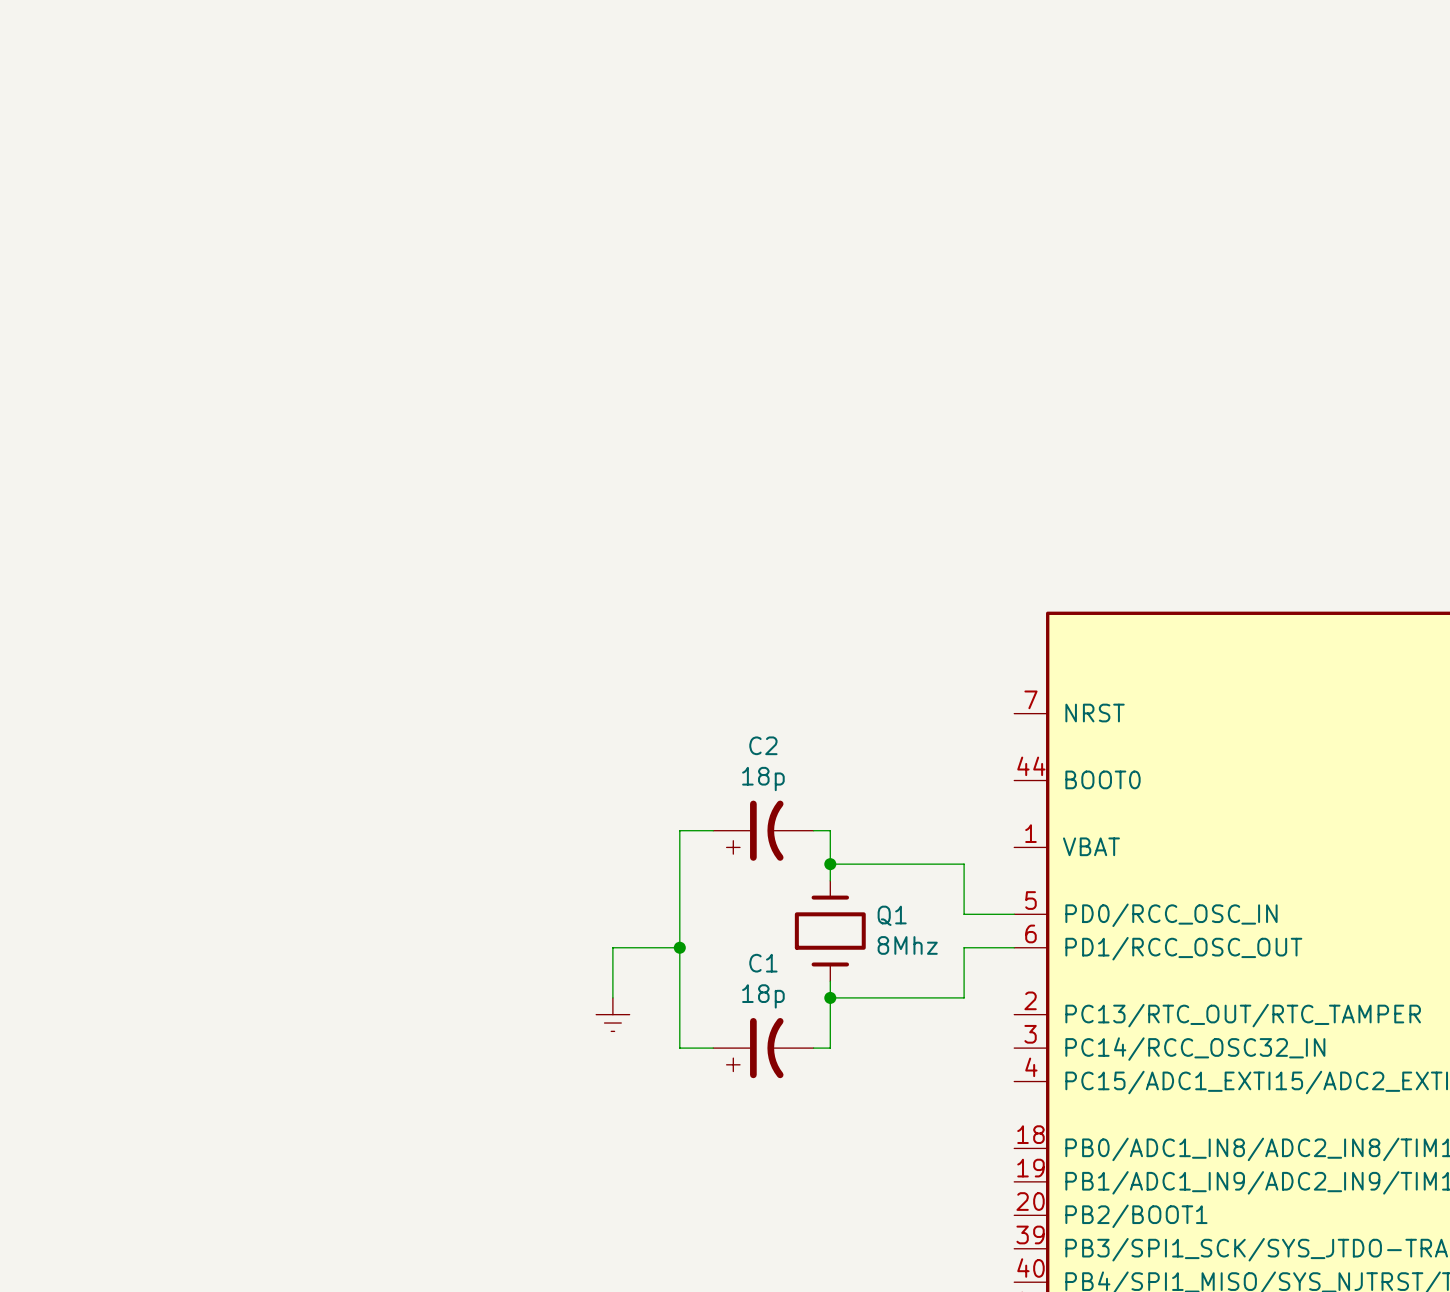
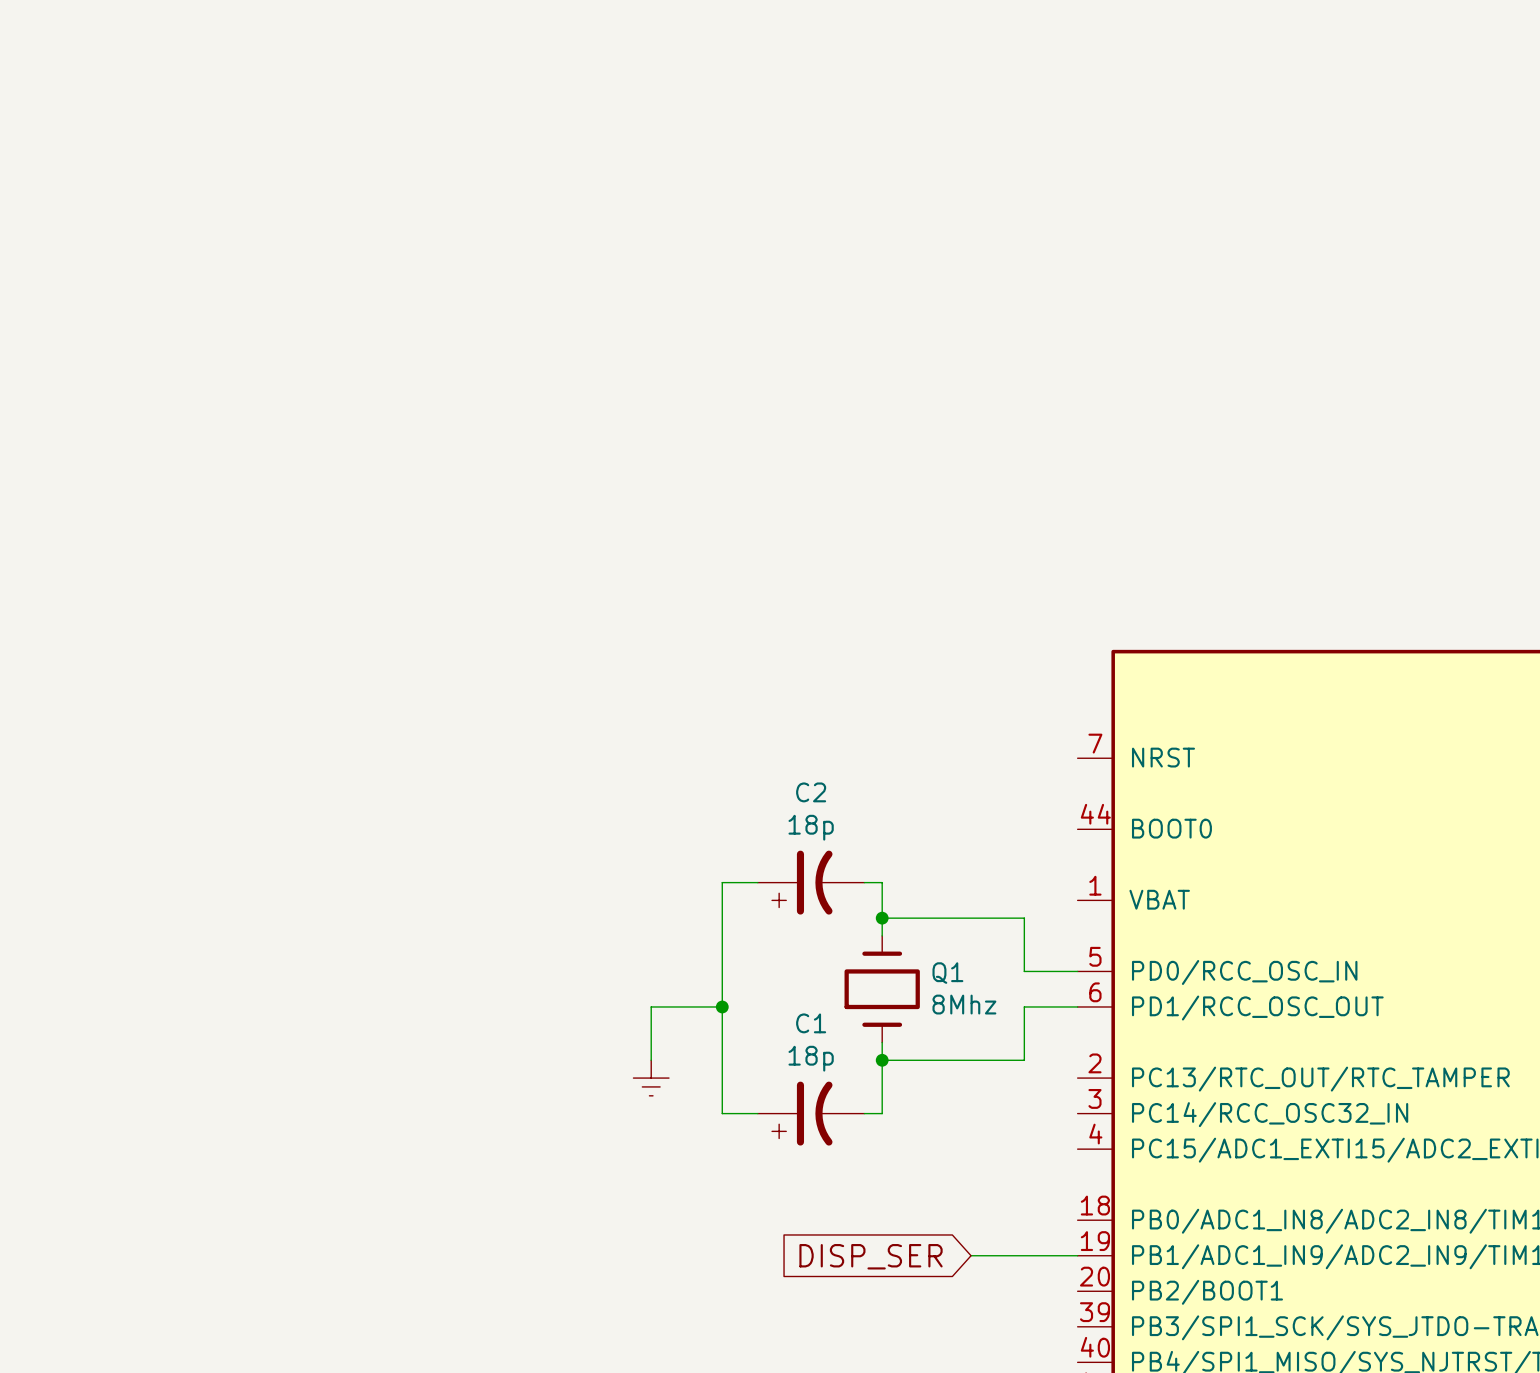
wire: none -> (971, 1255) (1077, 1255)
global label: none -> DISP_SER (871, 1256)

